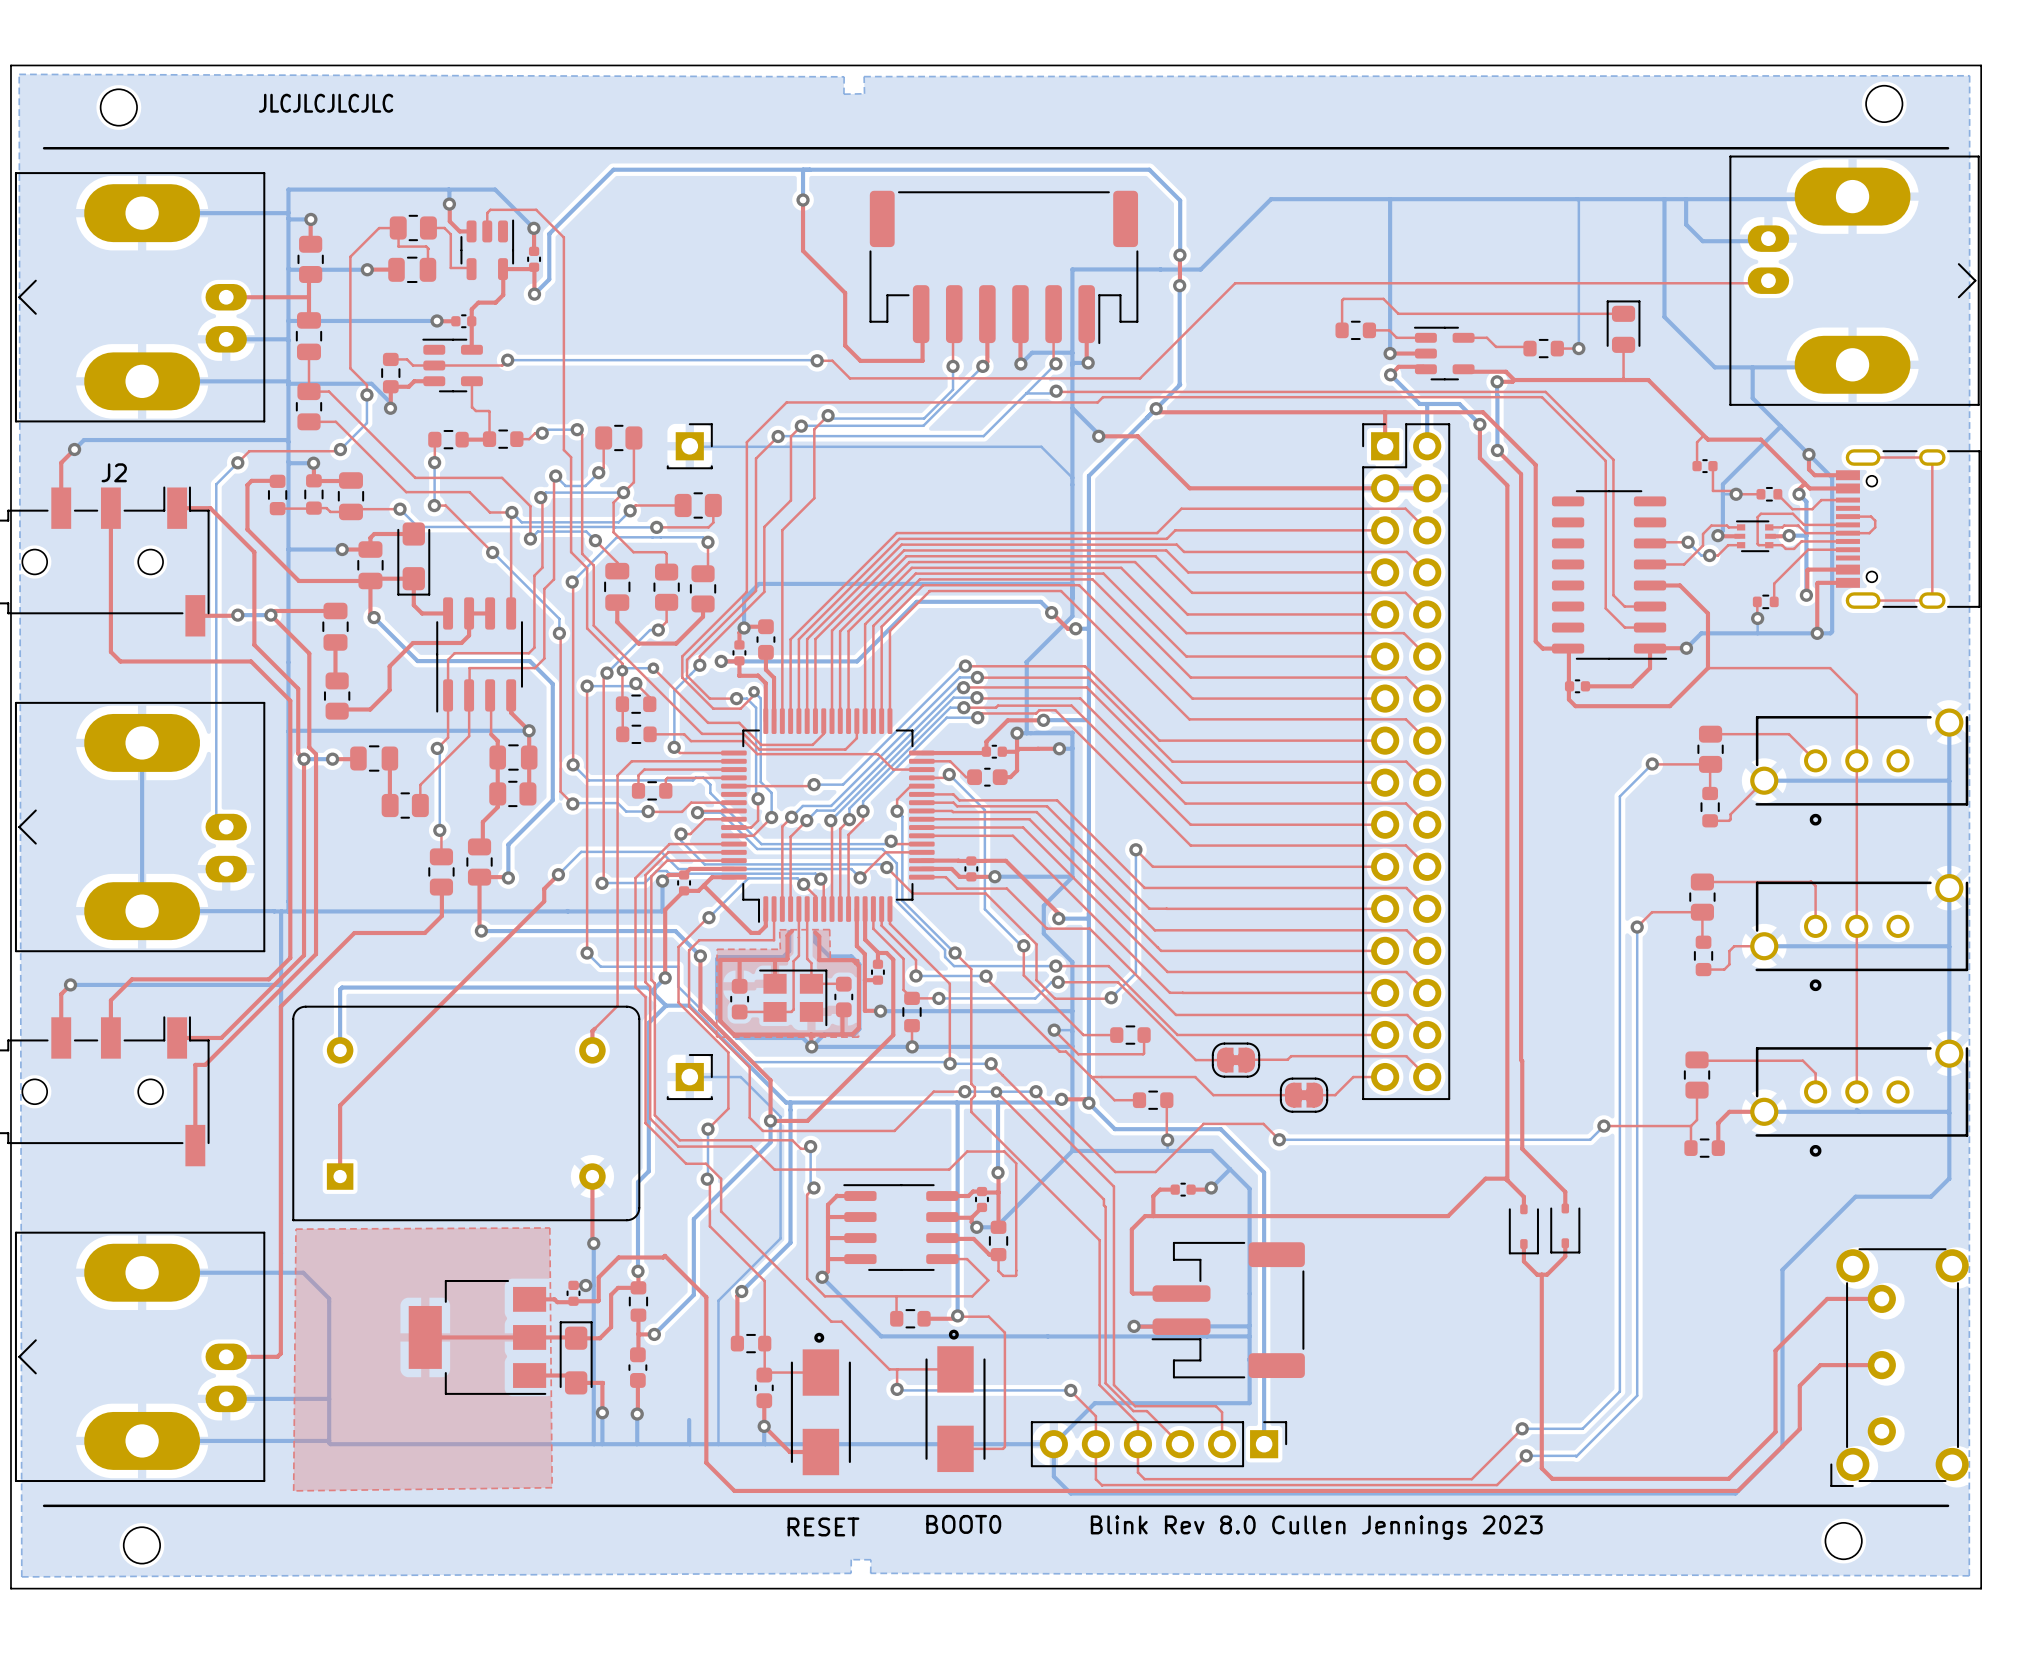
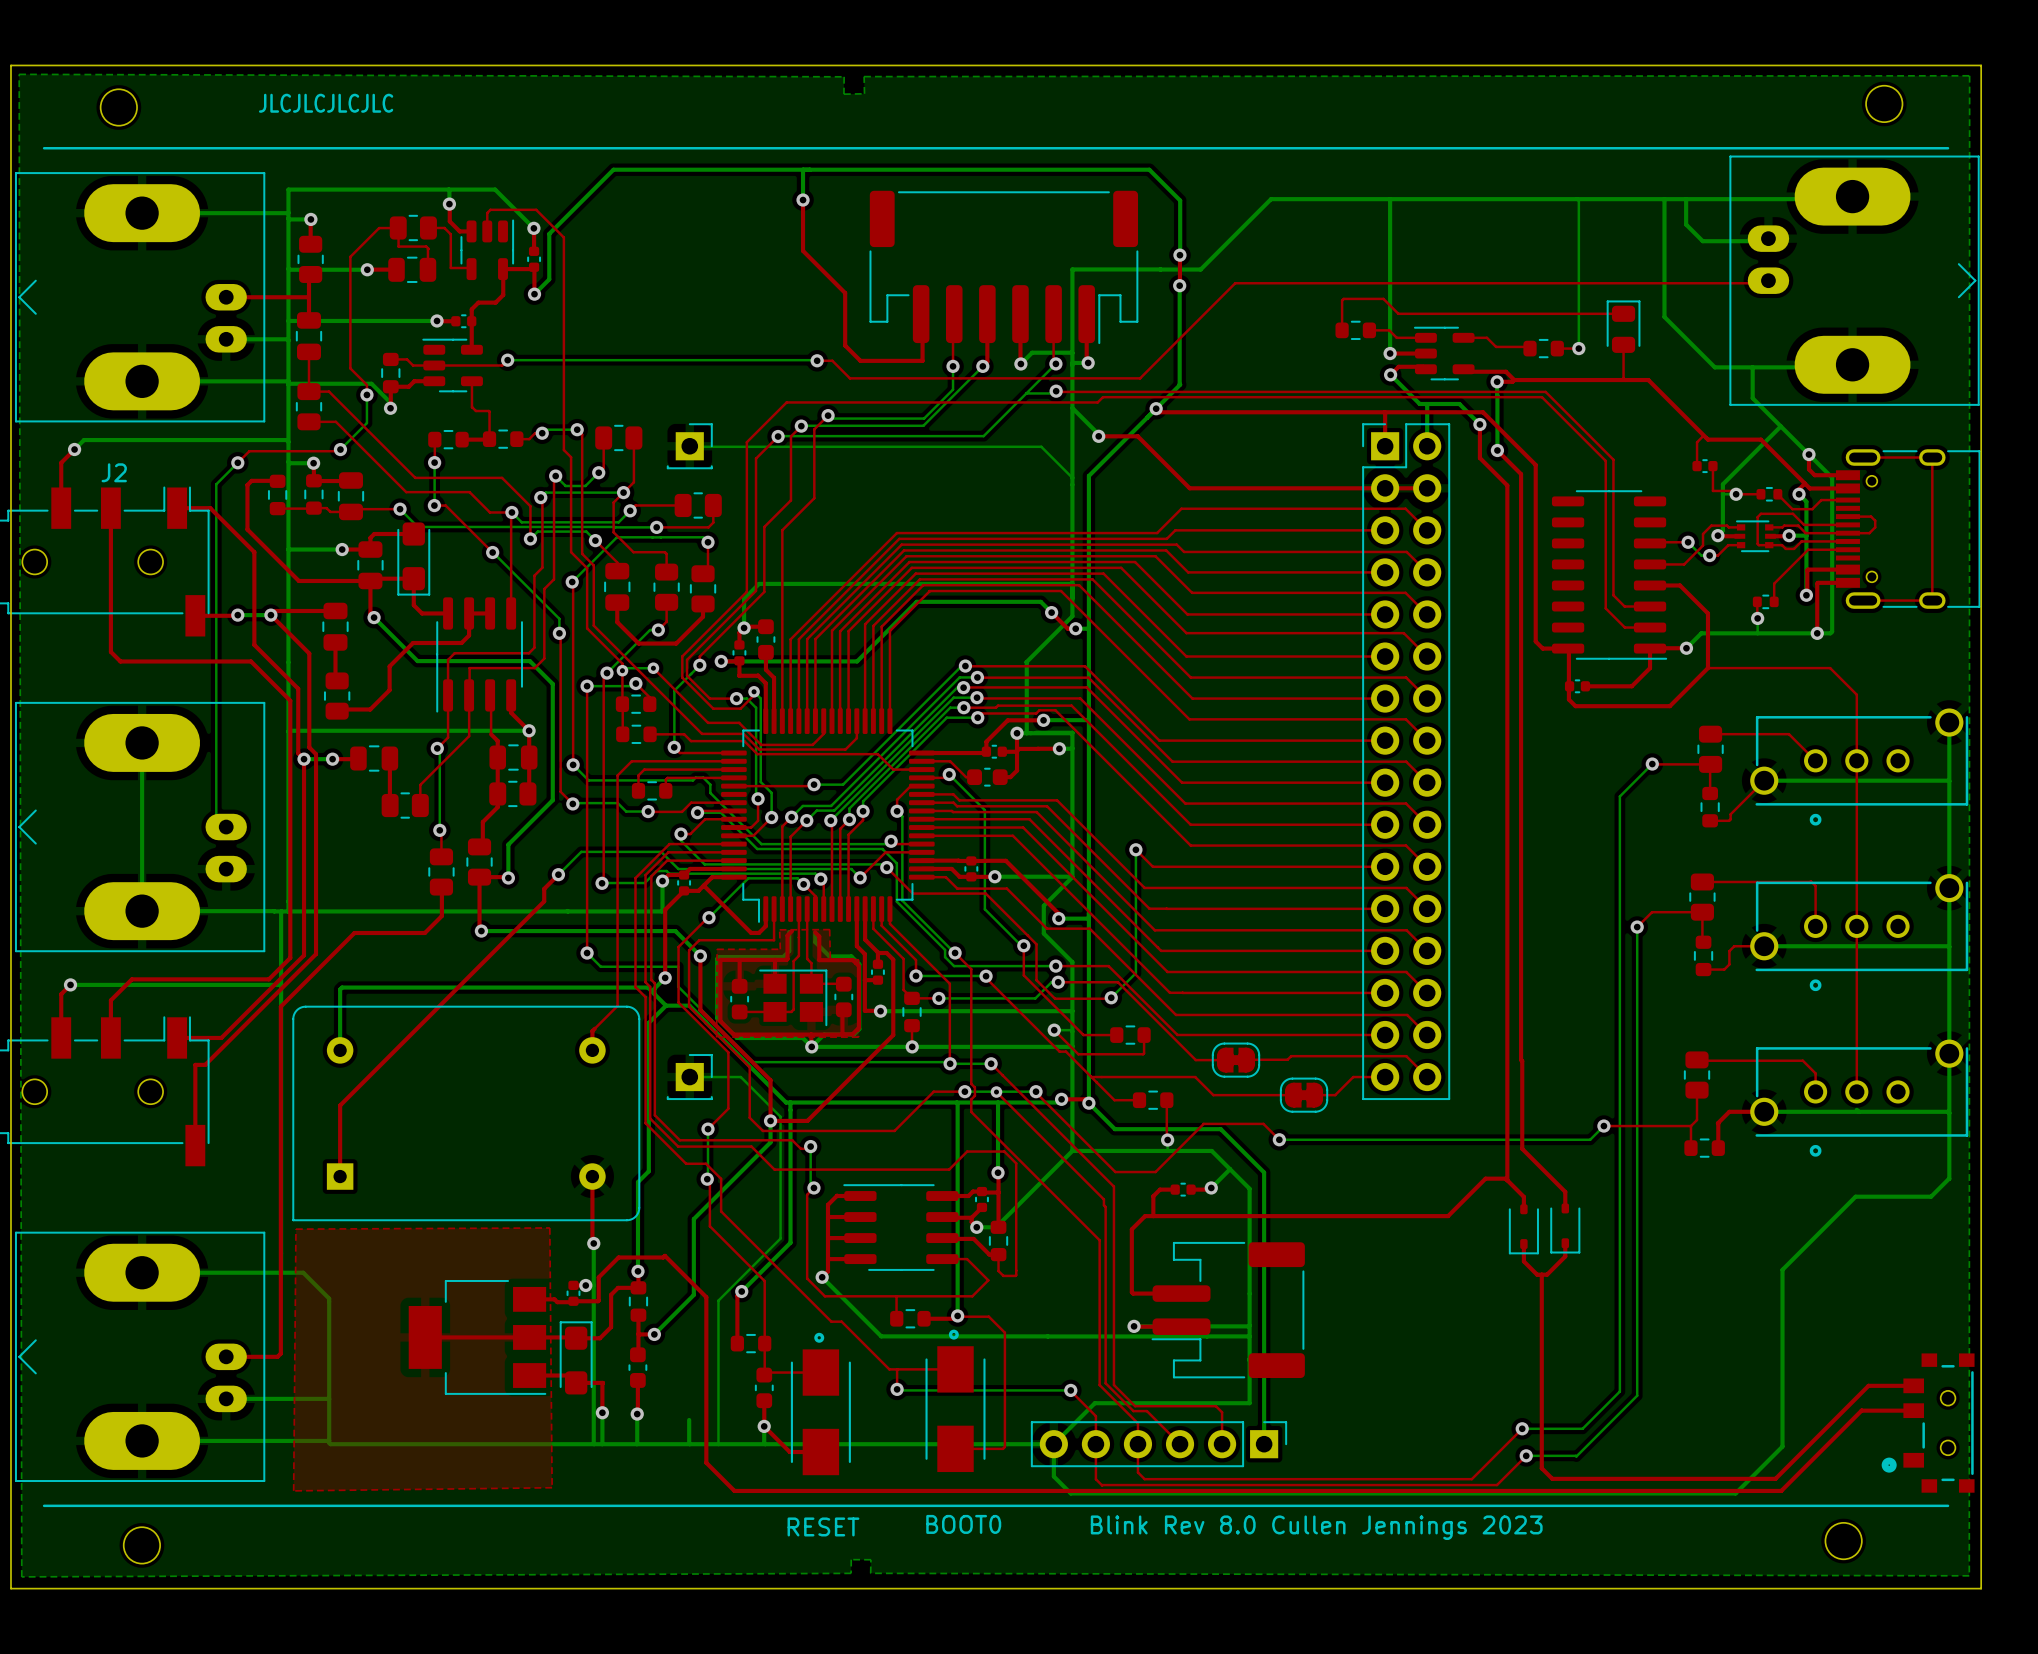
top track: (1881, 1298) (1827, 1298) (1775, 1350) (1775, 1432) (1728, 1478) -> (1913, 1385) (1868, 1385) (1775, 1478) (1728, 1478)
top track: (1881, 1365) (1820, 1365) (1799, 1385) (1799, 1429) (1737, 1490) -> (1861, 1410) (1781, 1490) (1737, 1490)
part: (1899, 1367) -> none
top track: none -> (1861, 1410) (1913, 1410)
part: none -> (1928, 1423)

